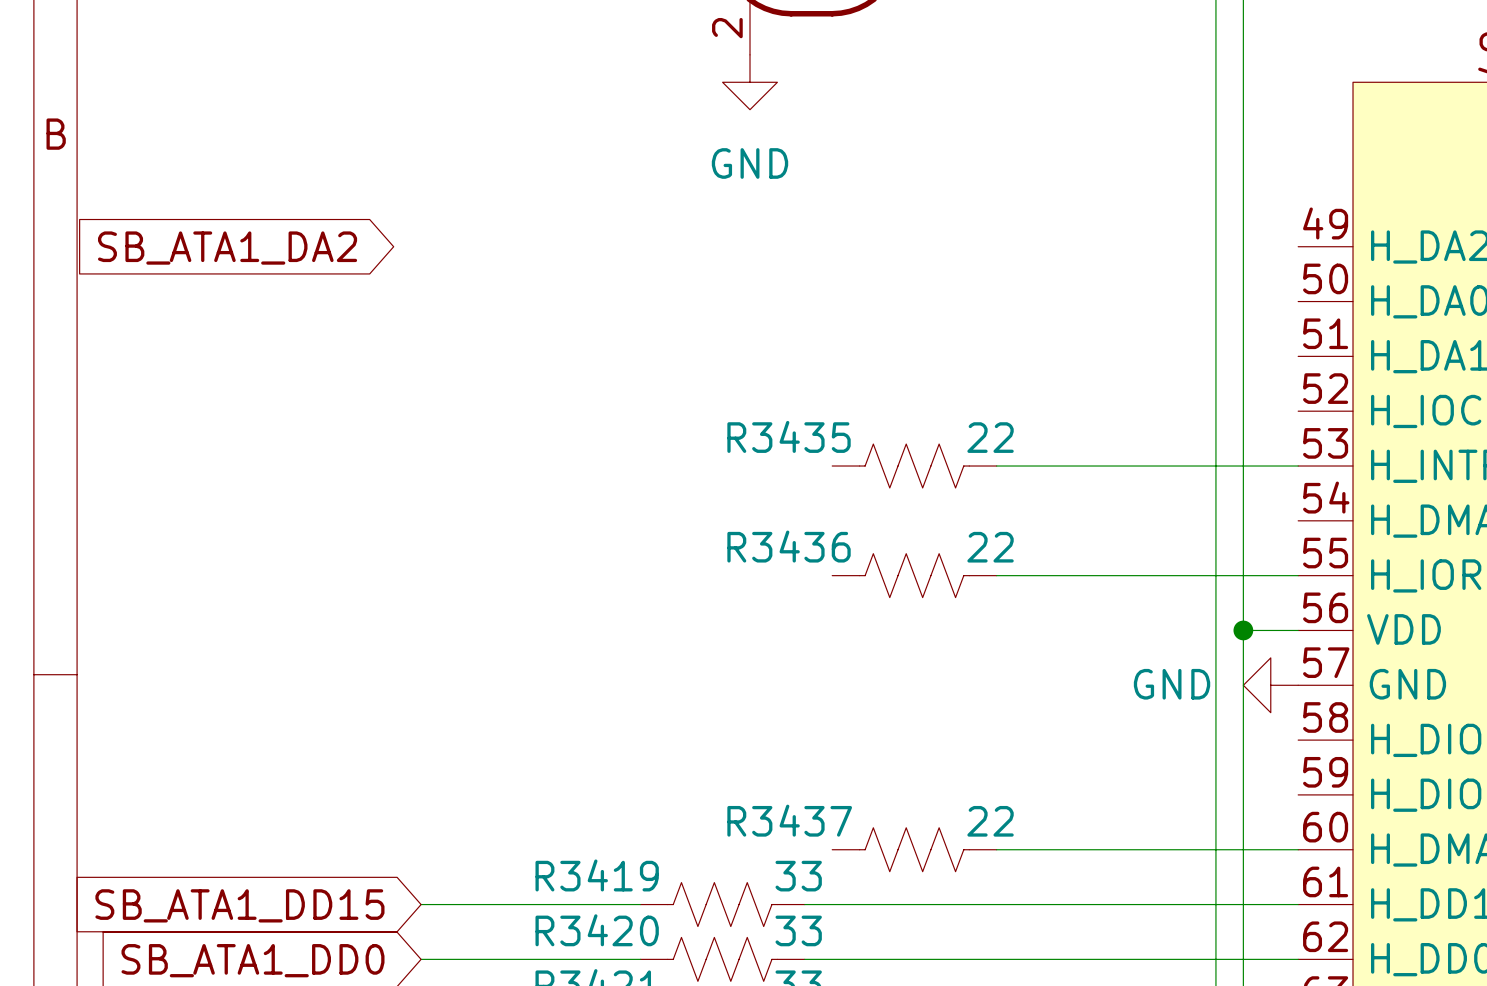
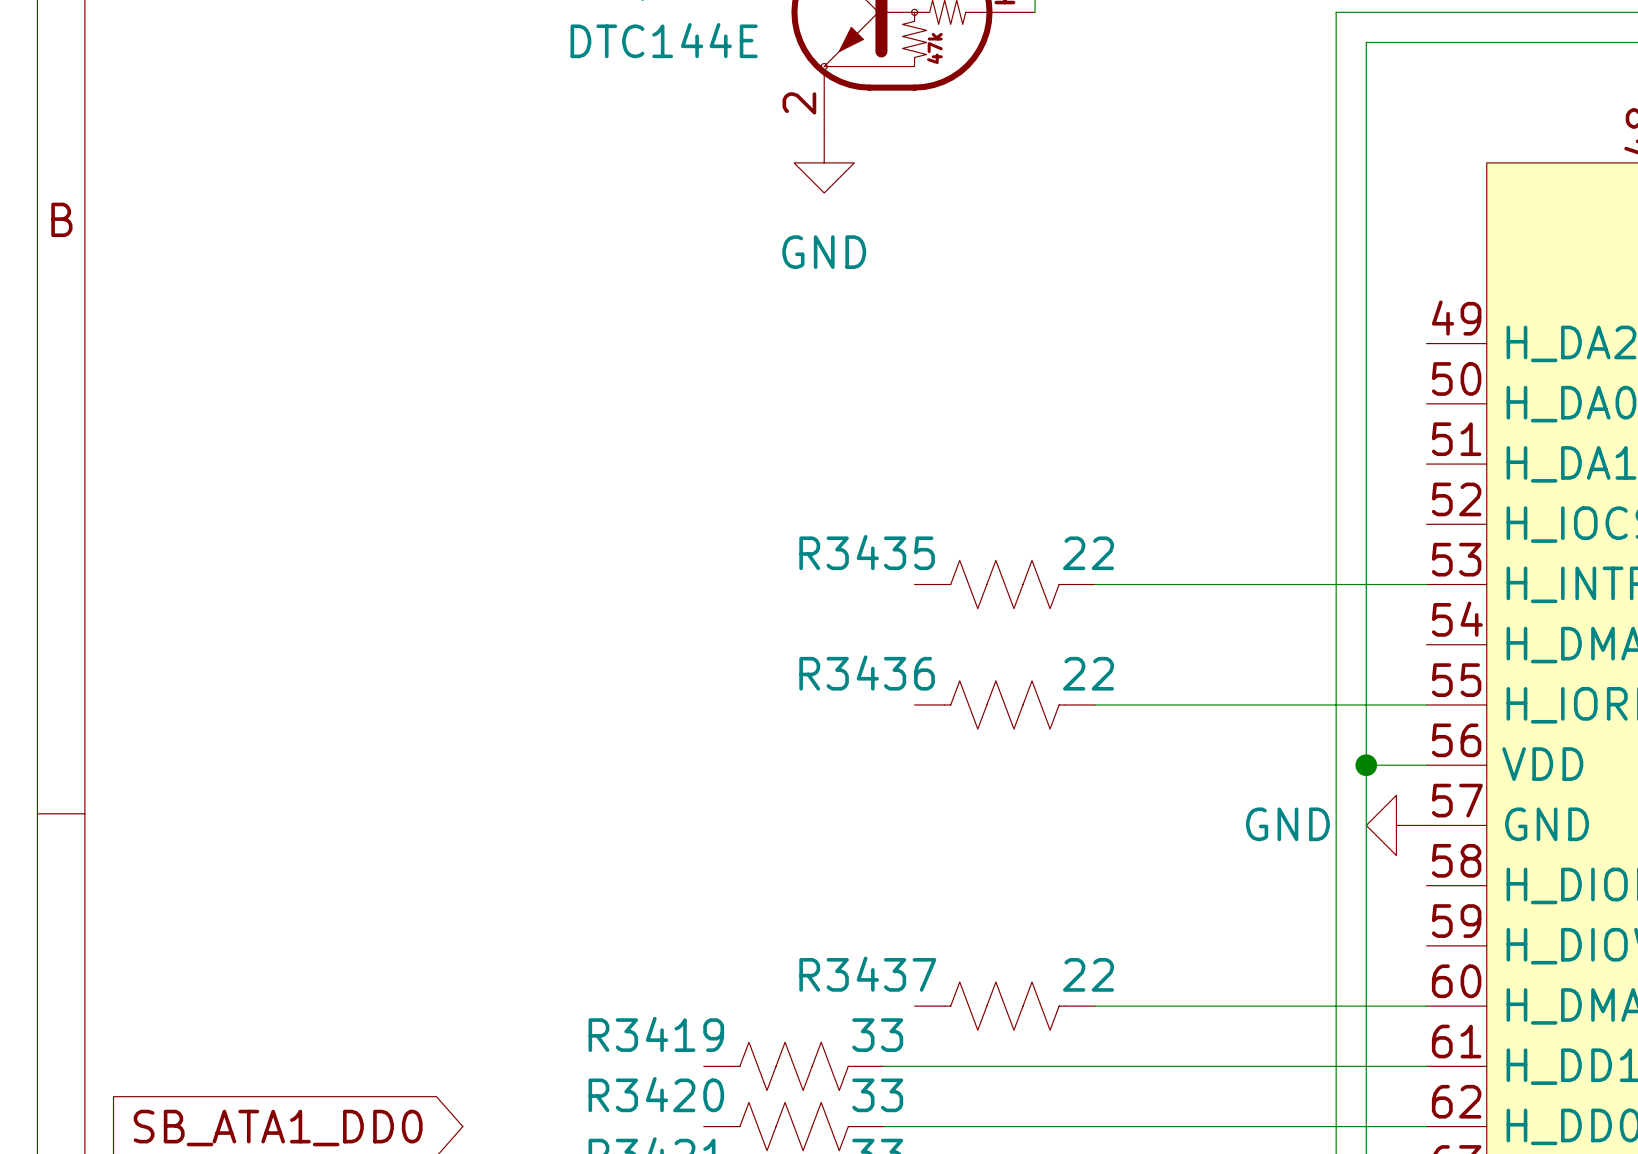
global label: SB_ATA1_DA2 (227, 248) -> none
wire: (421, 904) (640, 904) -> none
global label: SB_ATA1_DD15 (239, 905) -> none
wire: (421, 959) (640, 959) -> none

